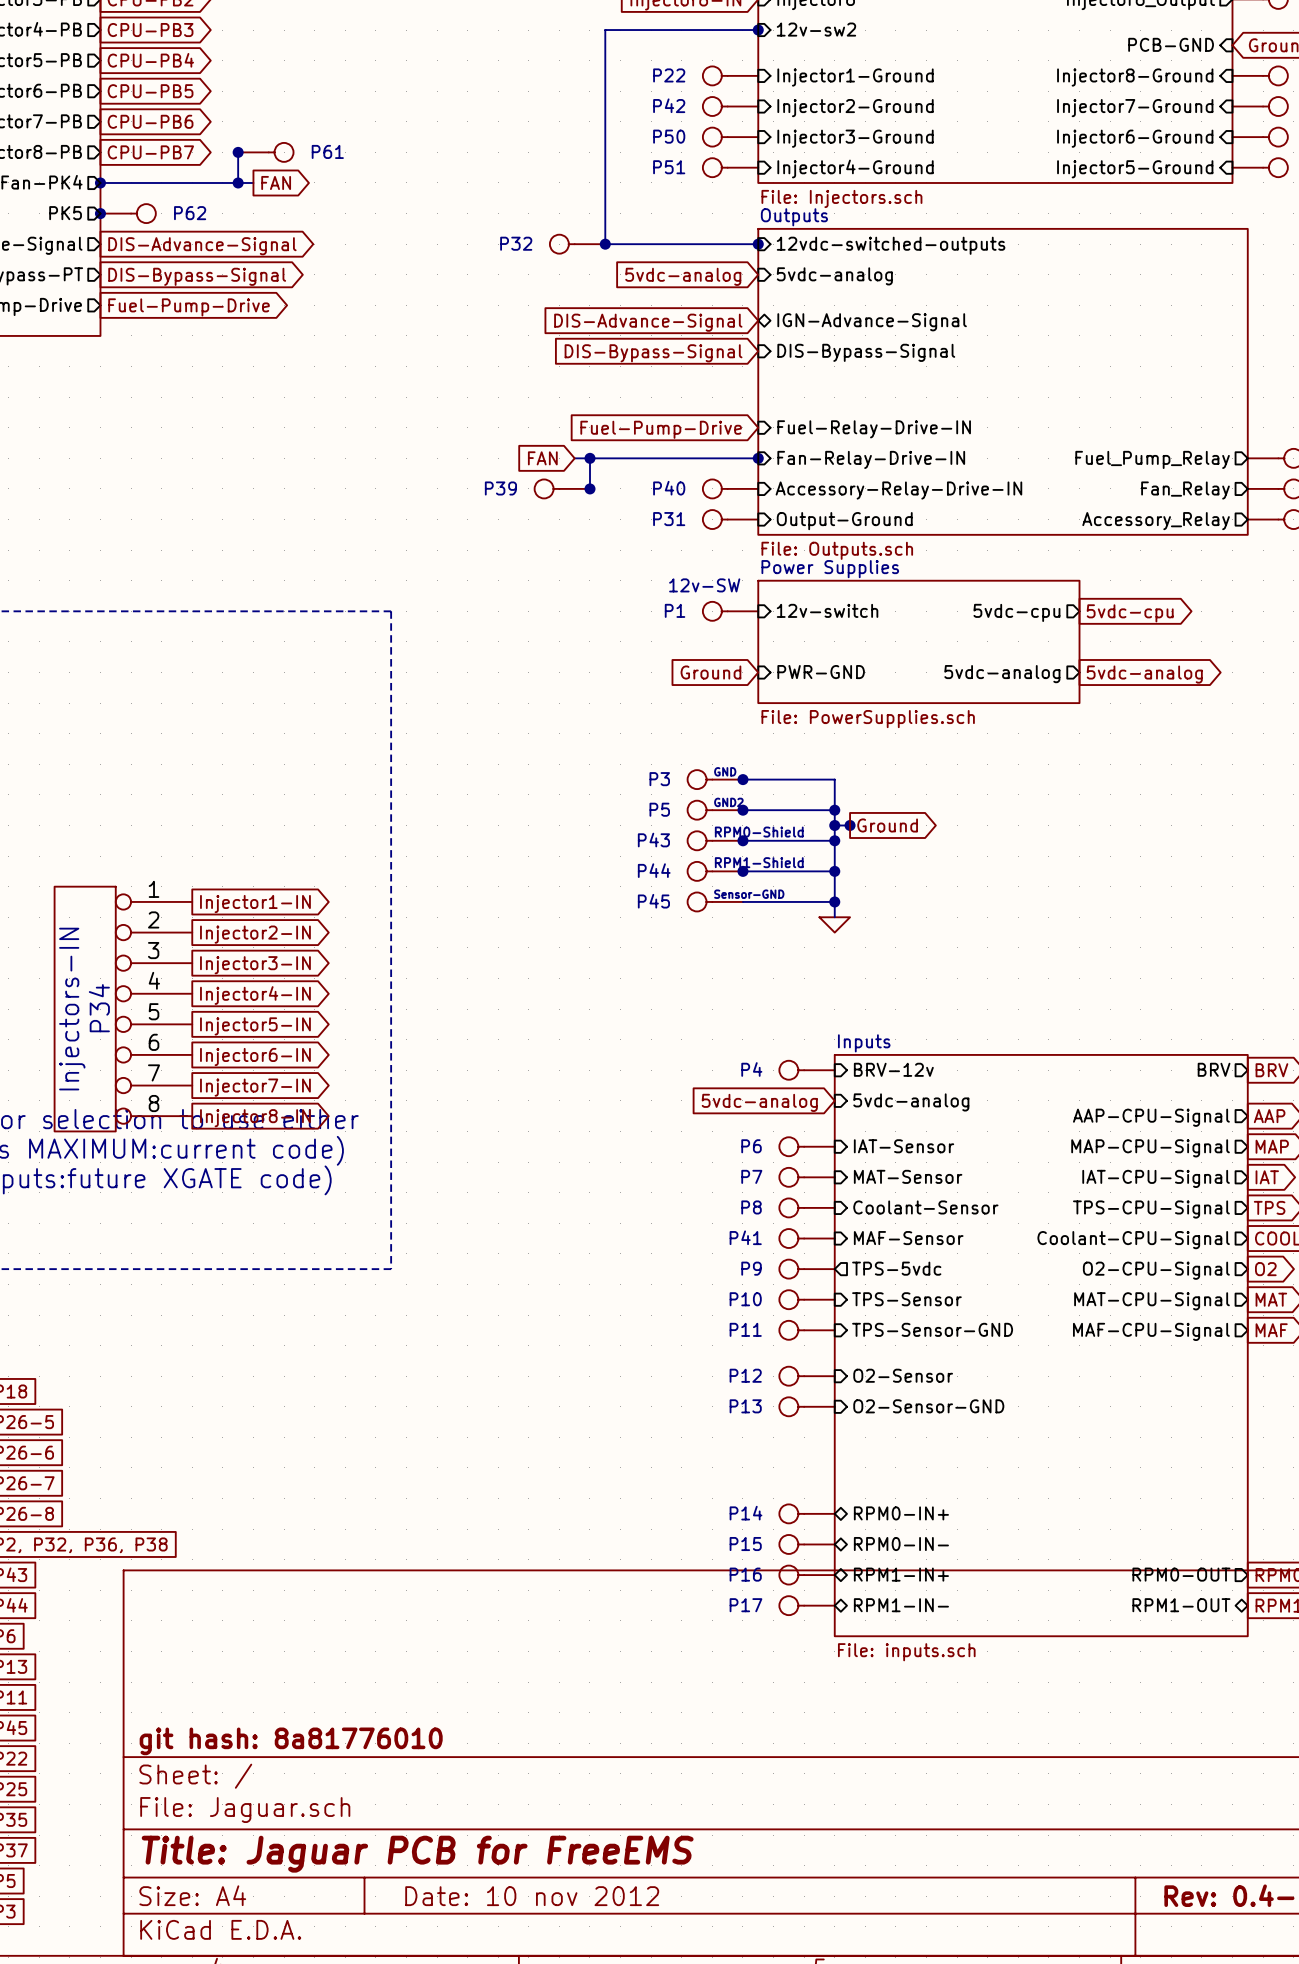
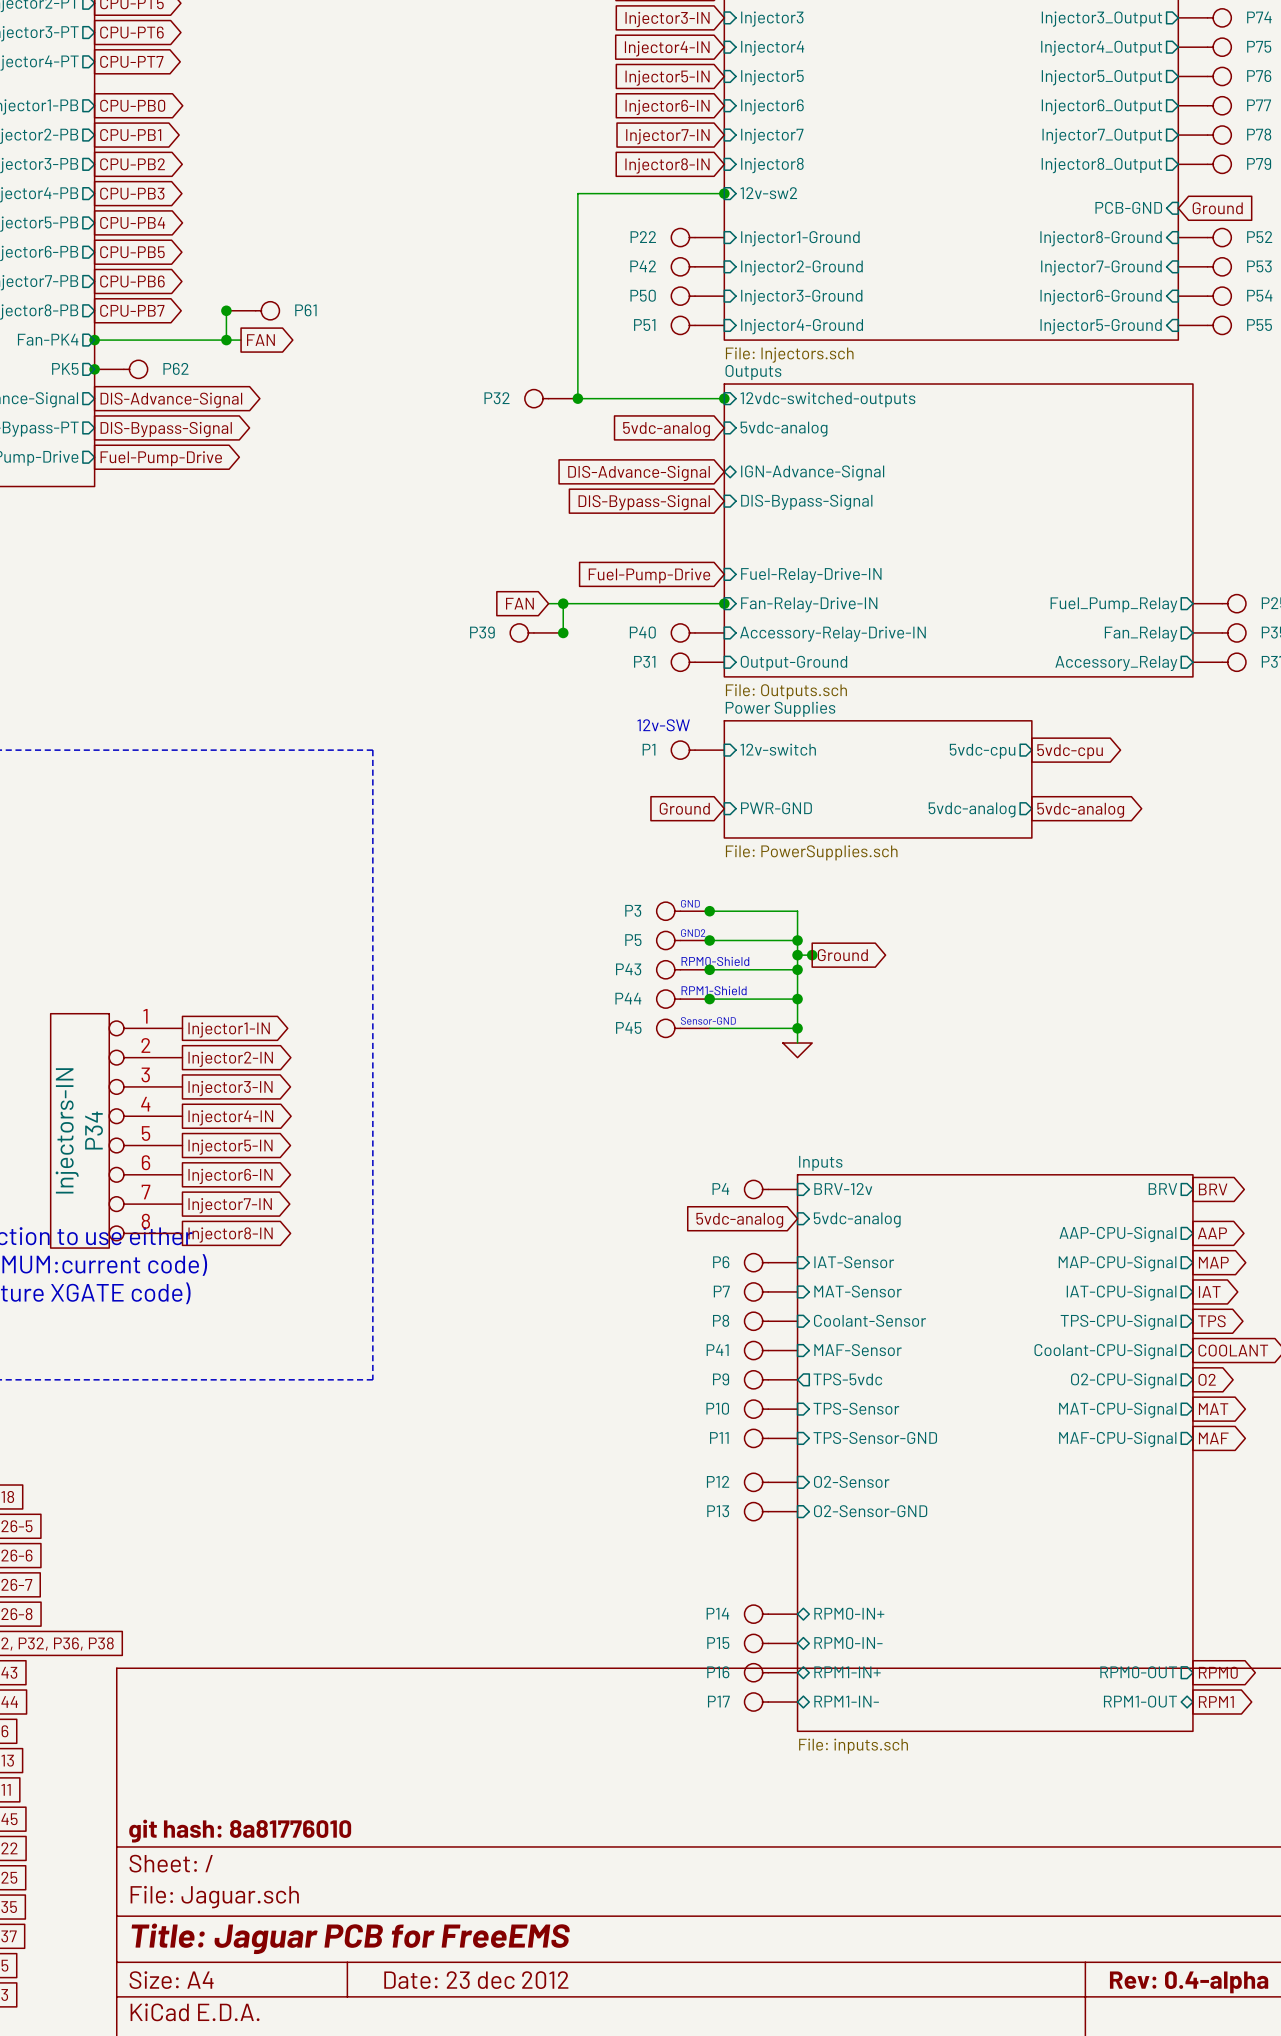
title block: Date: 10 nov 2012 (532, 1896) -> Date: 23 dec 2012 (476, 1980)

